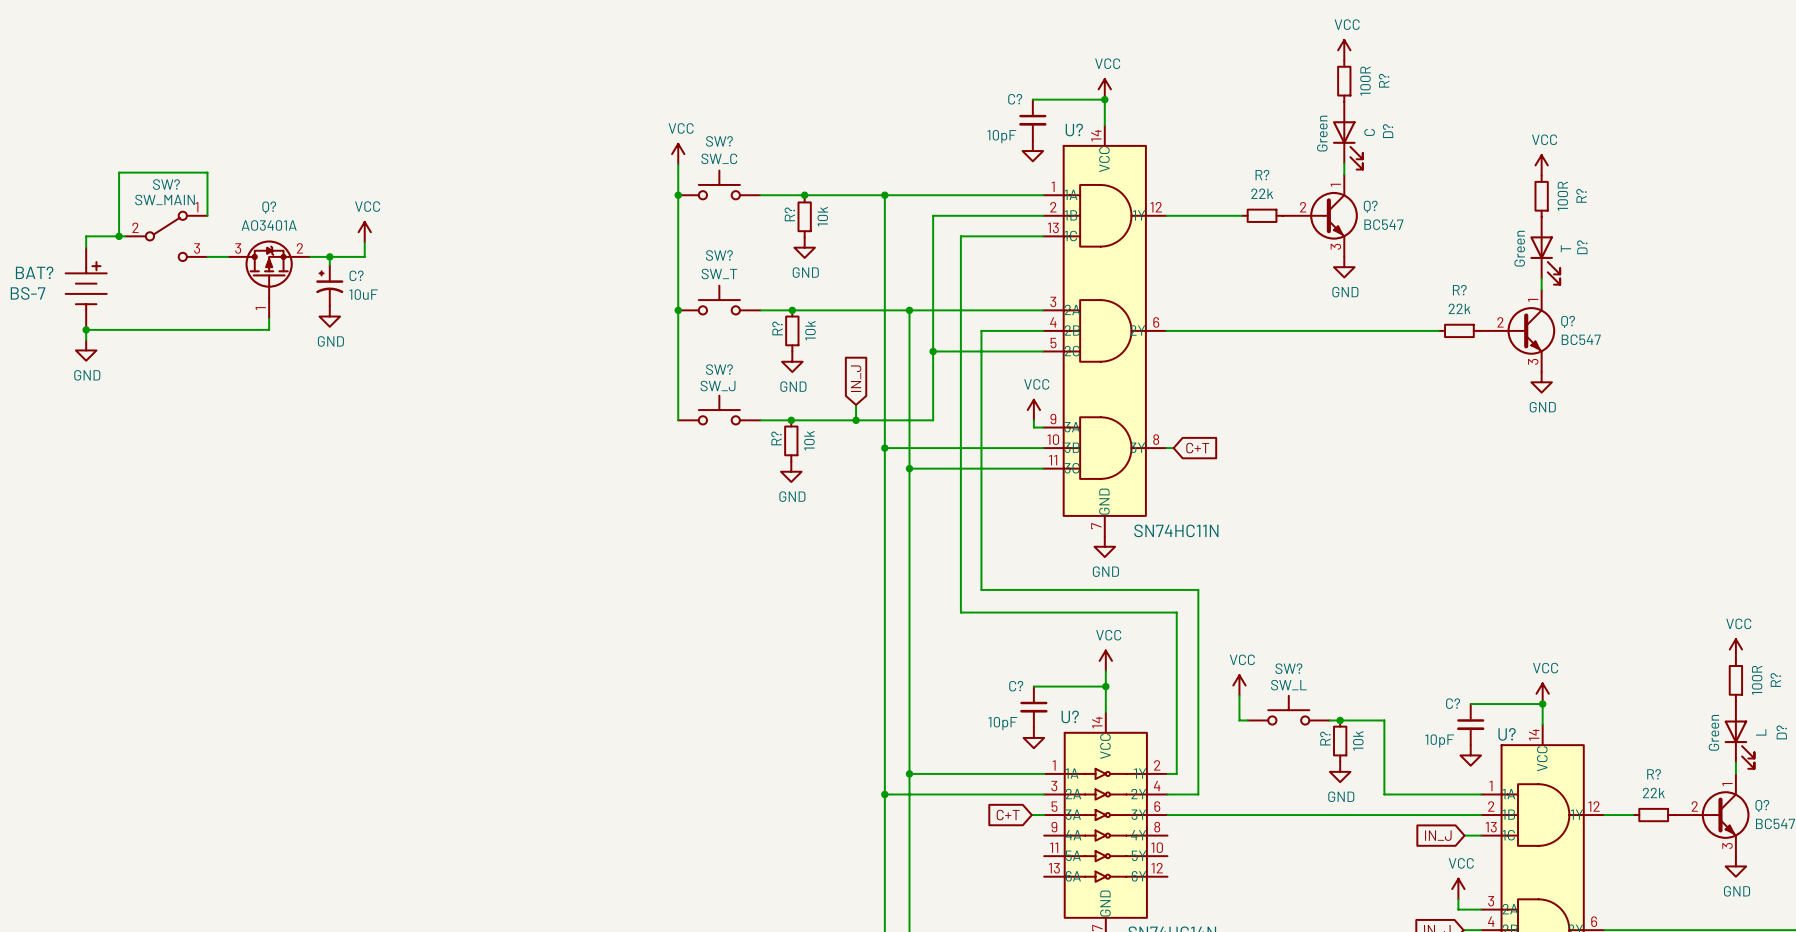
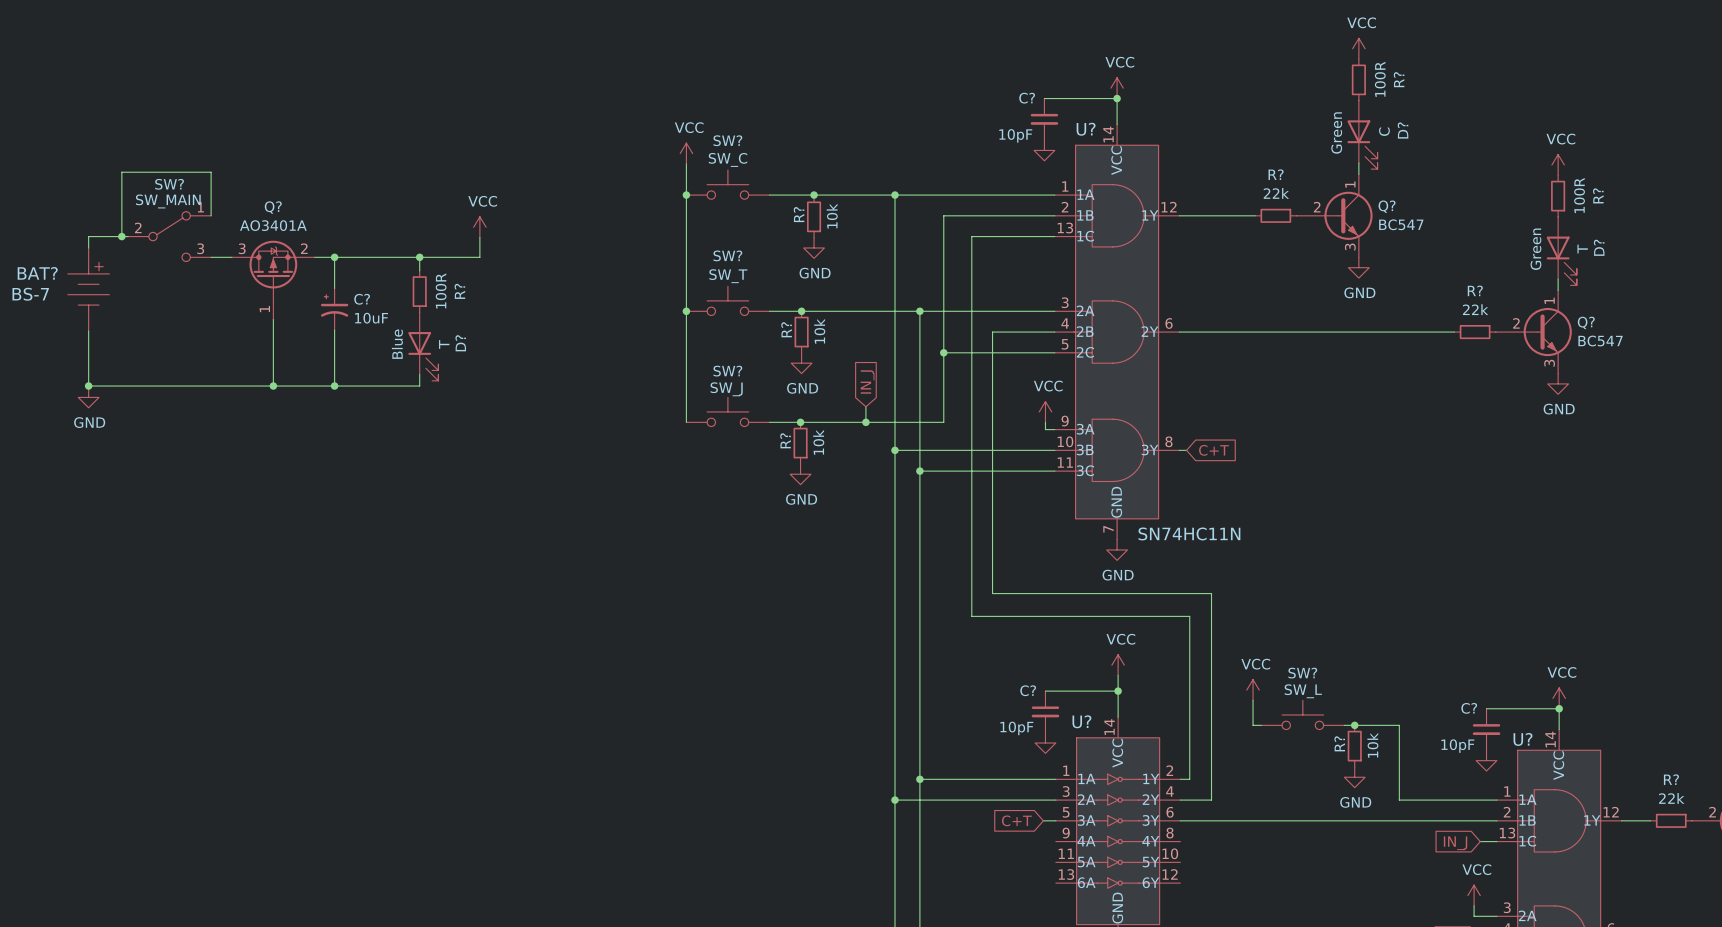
power symbol position: VCC (364, 232) -> VCC (479, 227)
wire: (364, 242) (364, 256) -> (479, 237) (479, 257) (369, 257)
wire: none -> (419, 257) (419, 270)
junction: none -> (419, 257)
C? position: (329, 285) -> (334, 309)
R?: none -> 100R (419, 291)
power symbol: GND (329, 316) -> none
wire: none -> (334, 329) (334, 386)
wire: (86, 329) (269, 329) -> (273, 386) (273, 331)
junction: (86, 329) -> none
wire: none -> (88, 341) (88, 387)
D?: none -> T (423, 346)
power symbol position: GND (86, 350) -> GND (88, 397)
wire: none -> (419, 374) (419, 386) (88, 386)
junction: none -> (88, 386)
junction: none -> (273, 386)
junction: none -> (334, 386)

